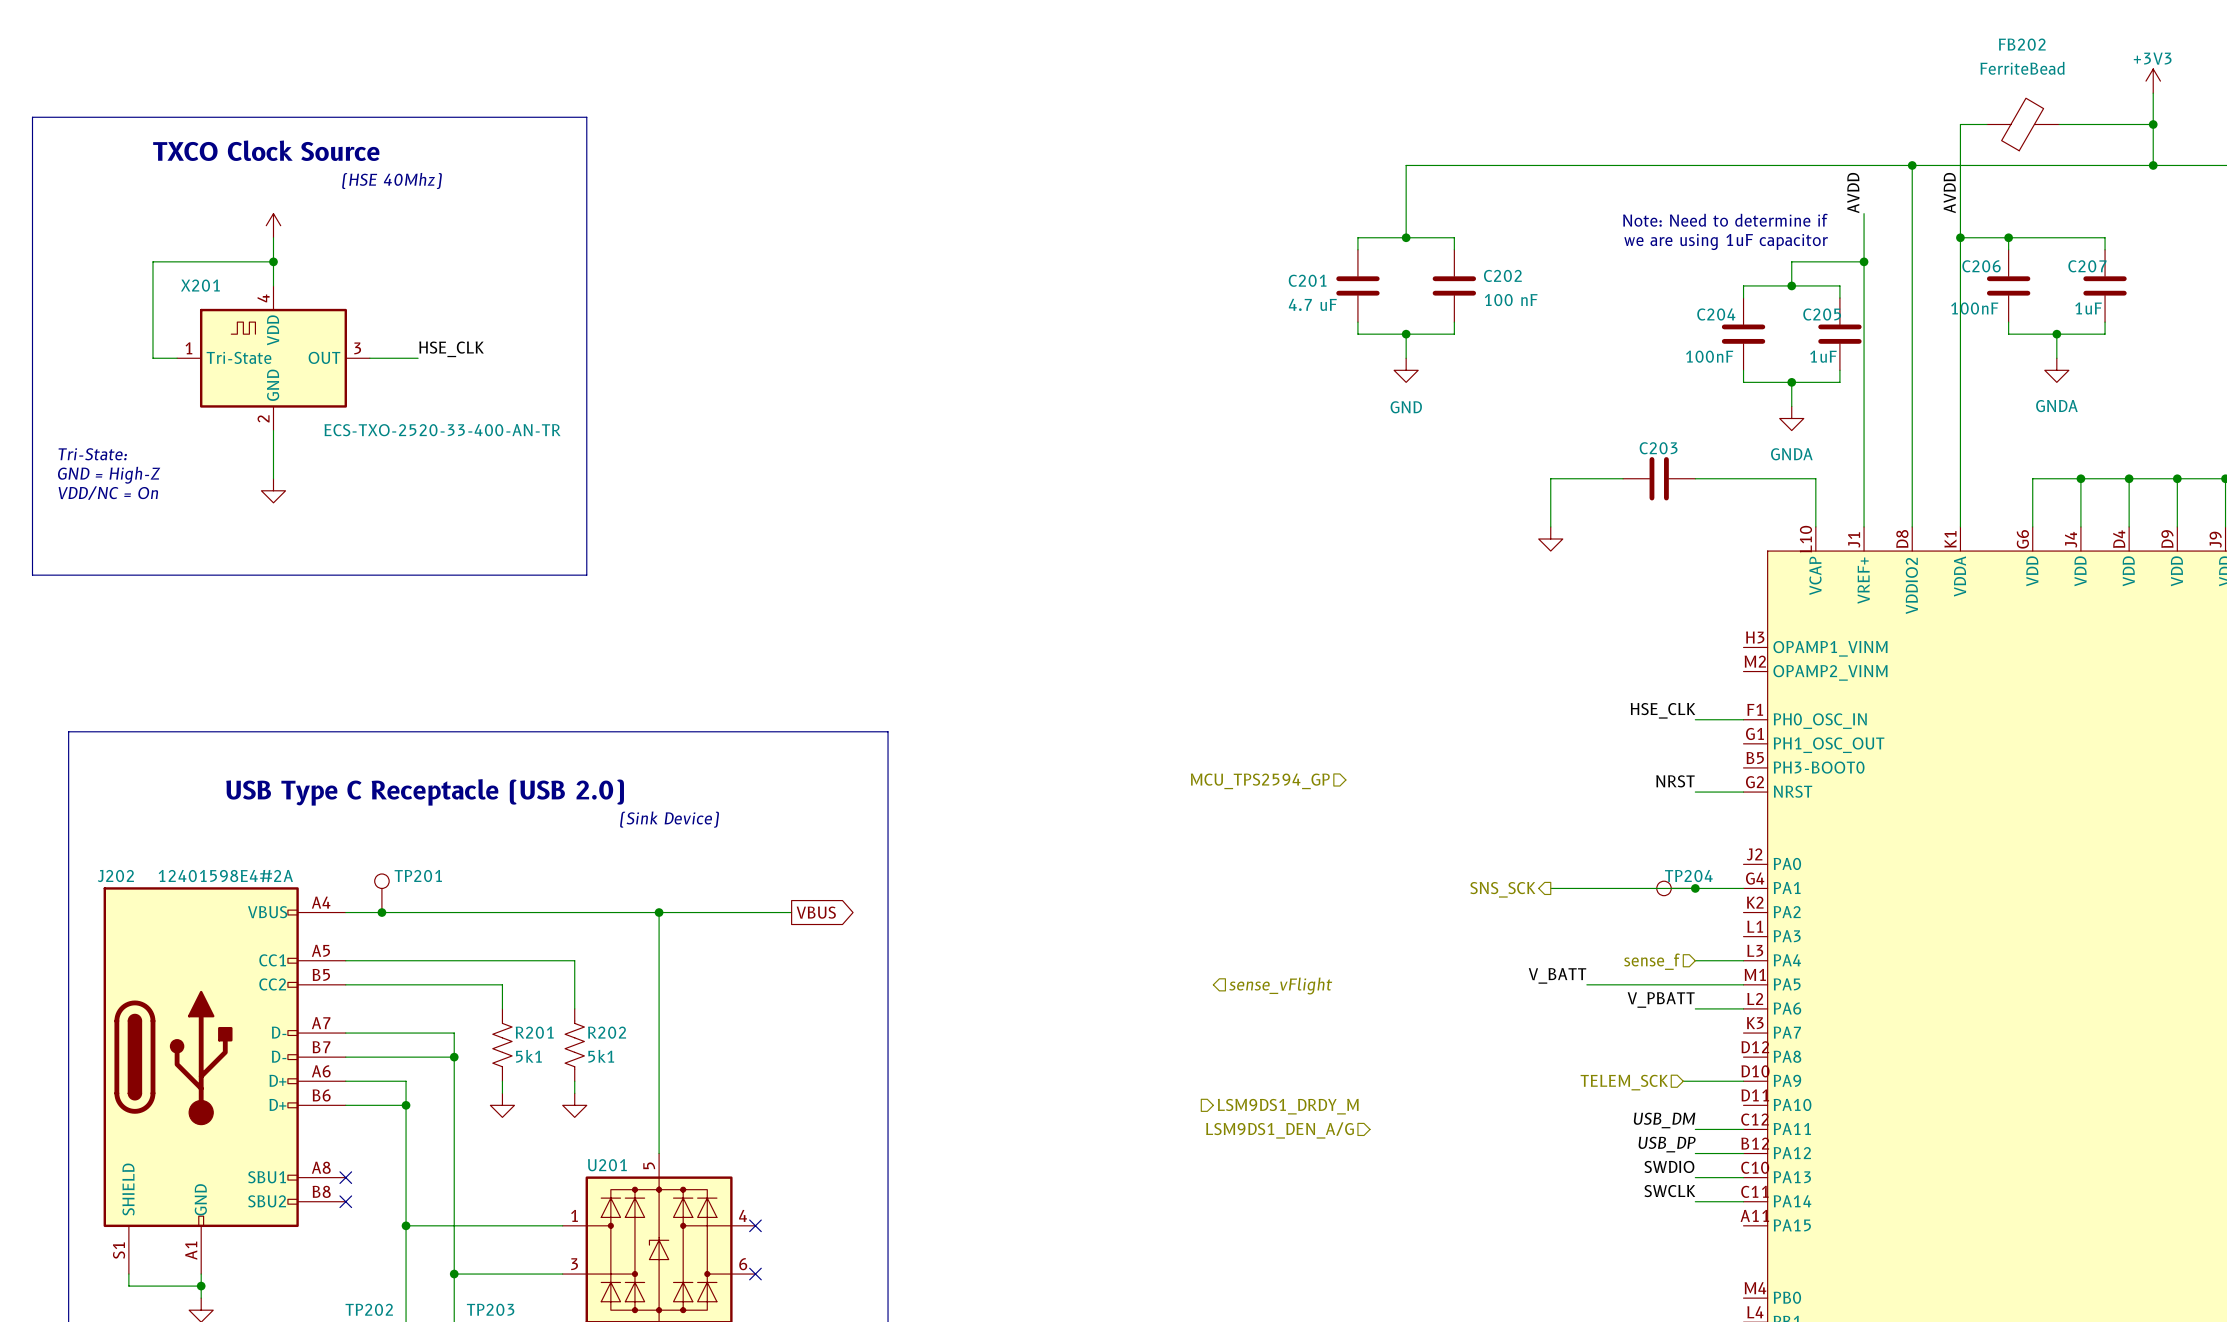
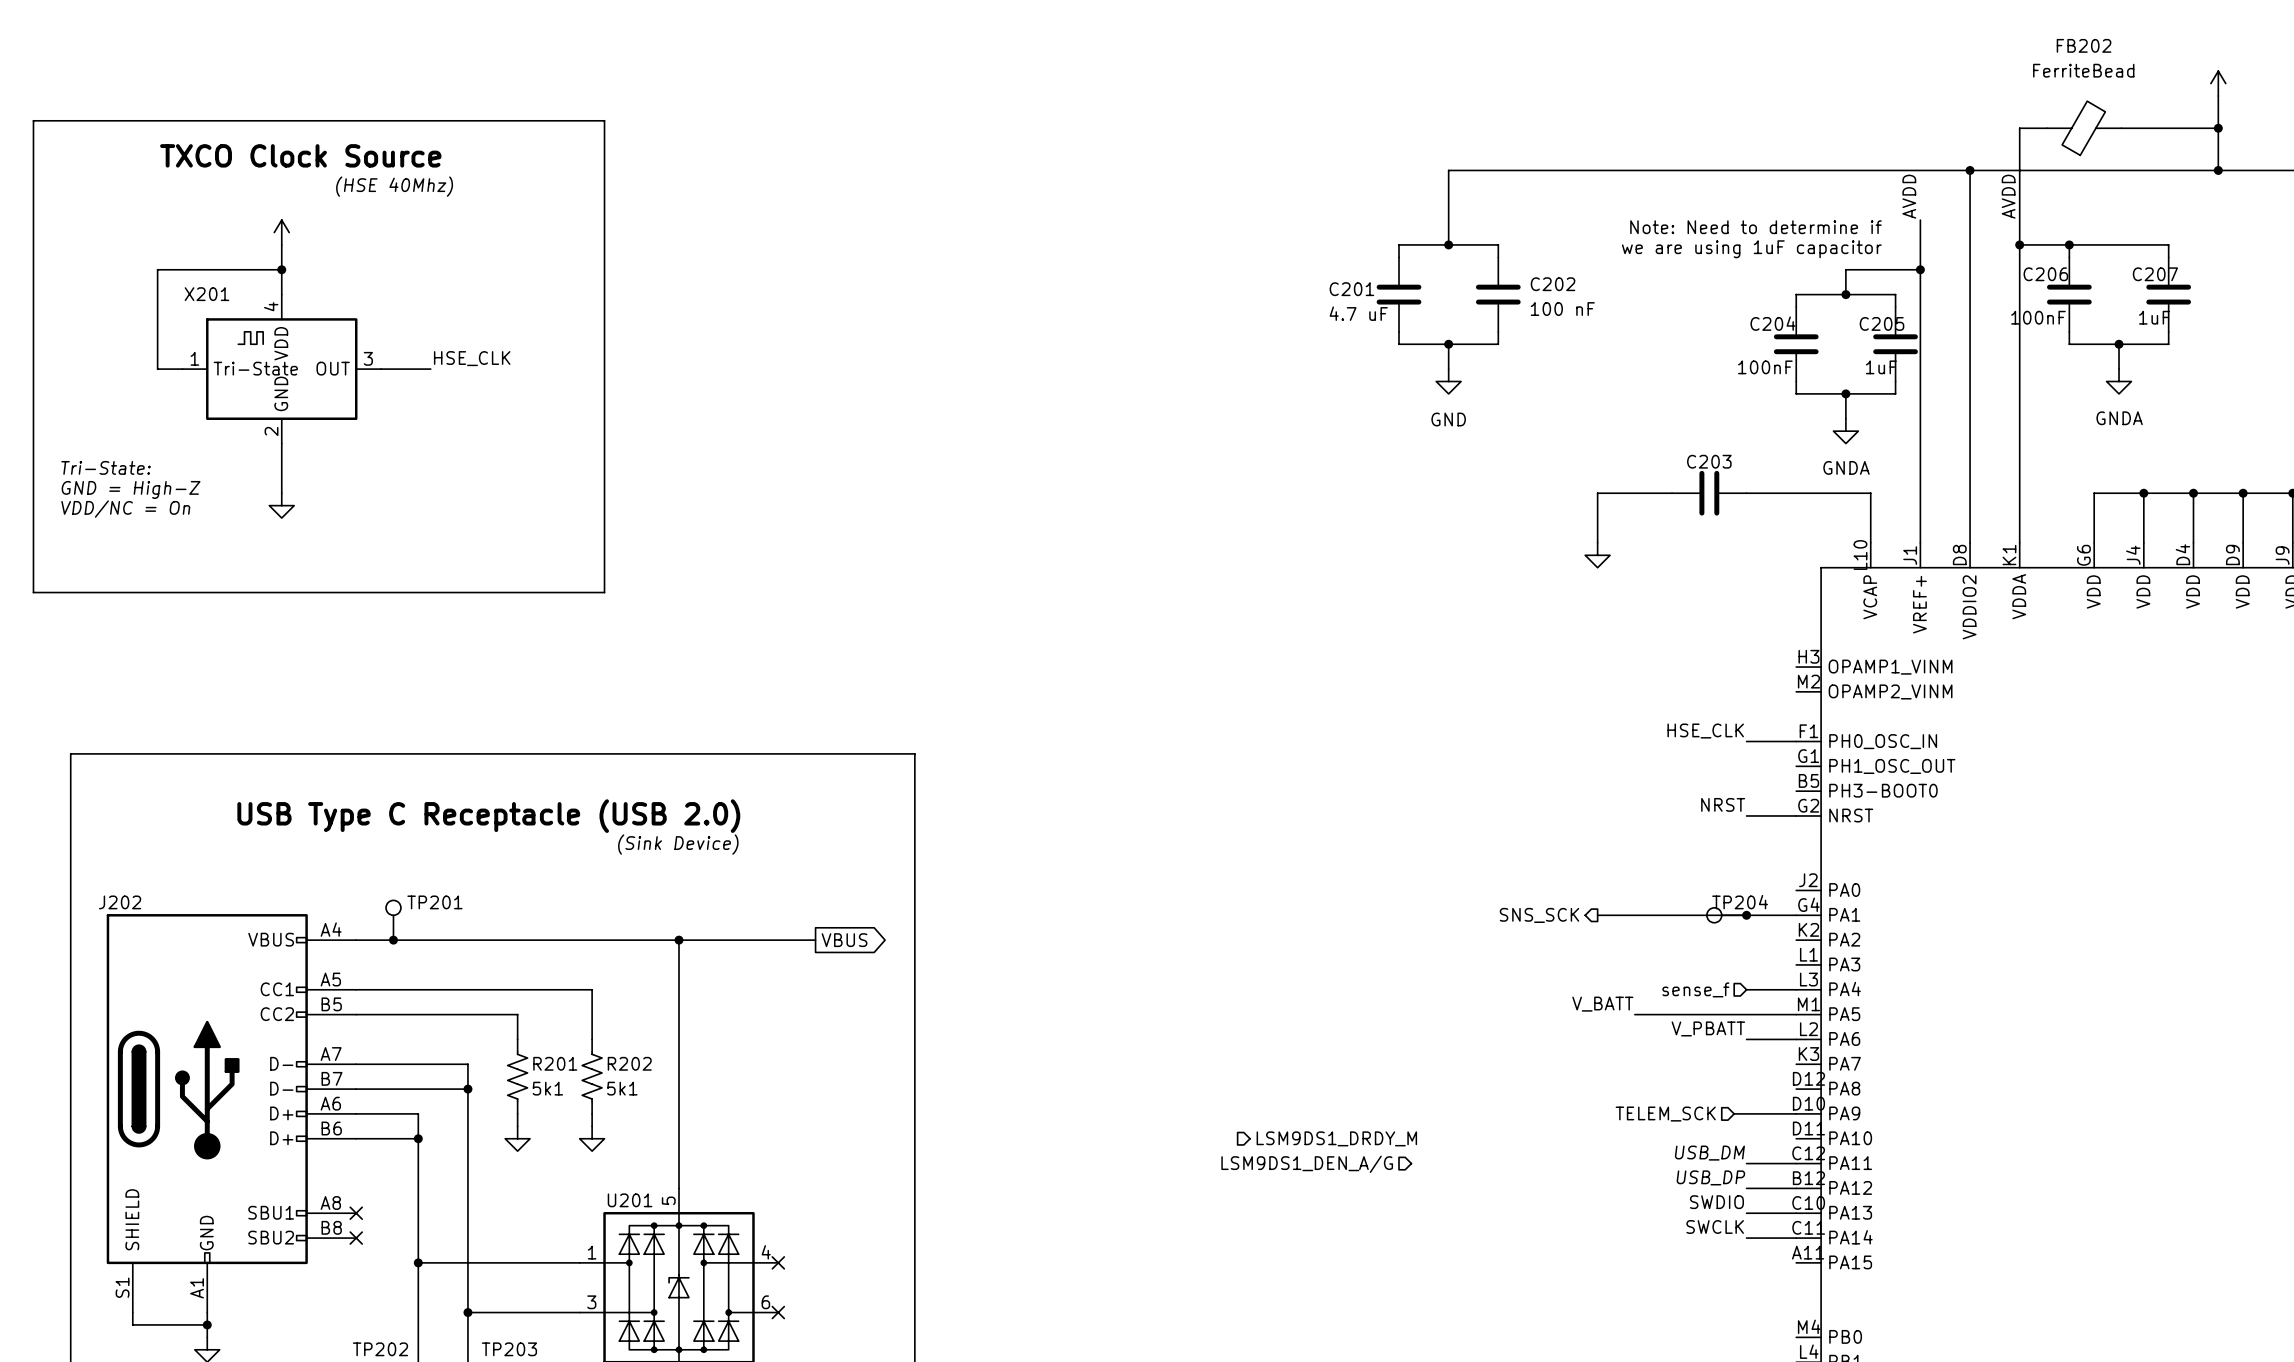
power symbol text: +3V3 (2152, 58) -> none
X201 value: ECS-TXO-2520-33-400-AN-TR (442, 430) -> none
hierarchical label: MCU_TPS2594_GP (1260, 781) -> none
J202 value: 12401598E4#2A (225, 876) -> none
hierarchical label: sense_vFlight (1280, 986) -> none

